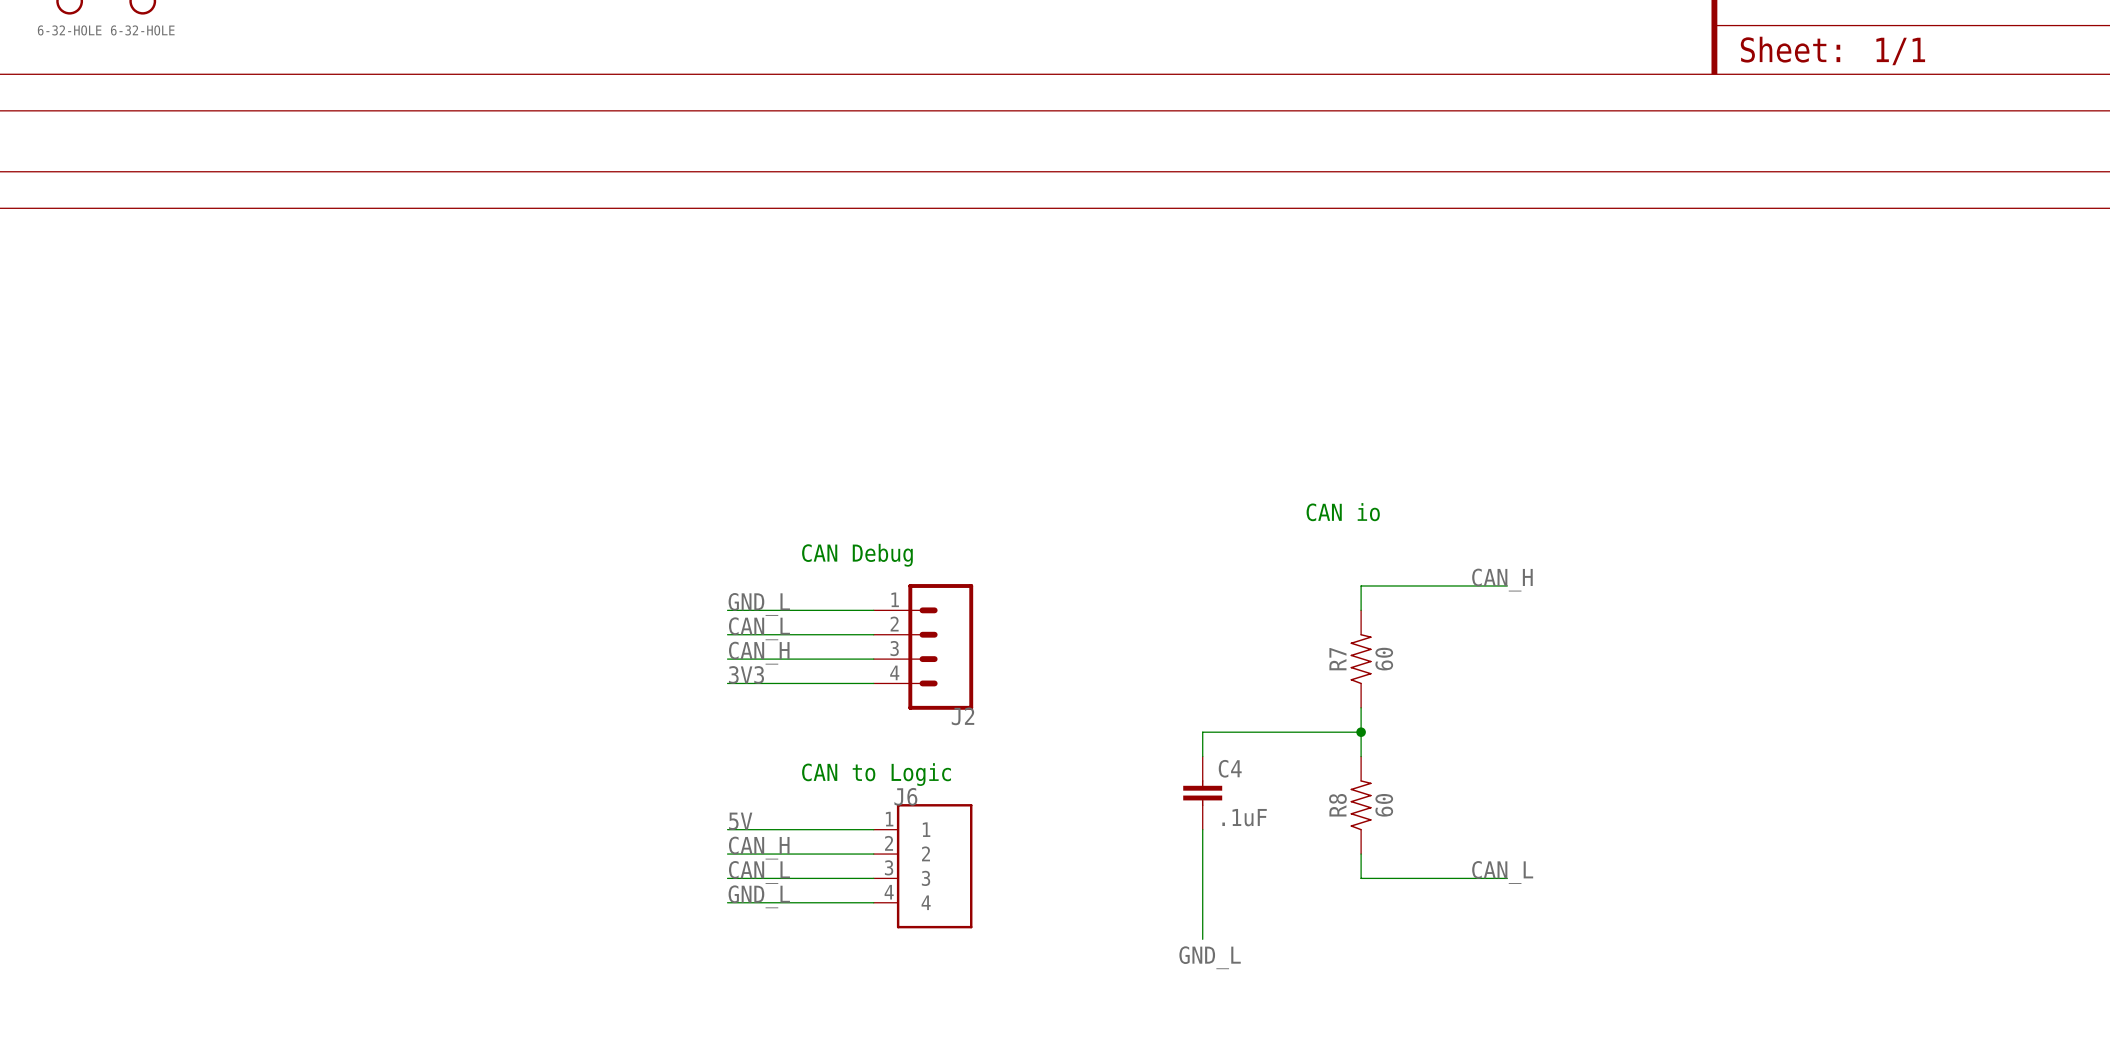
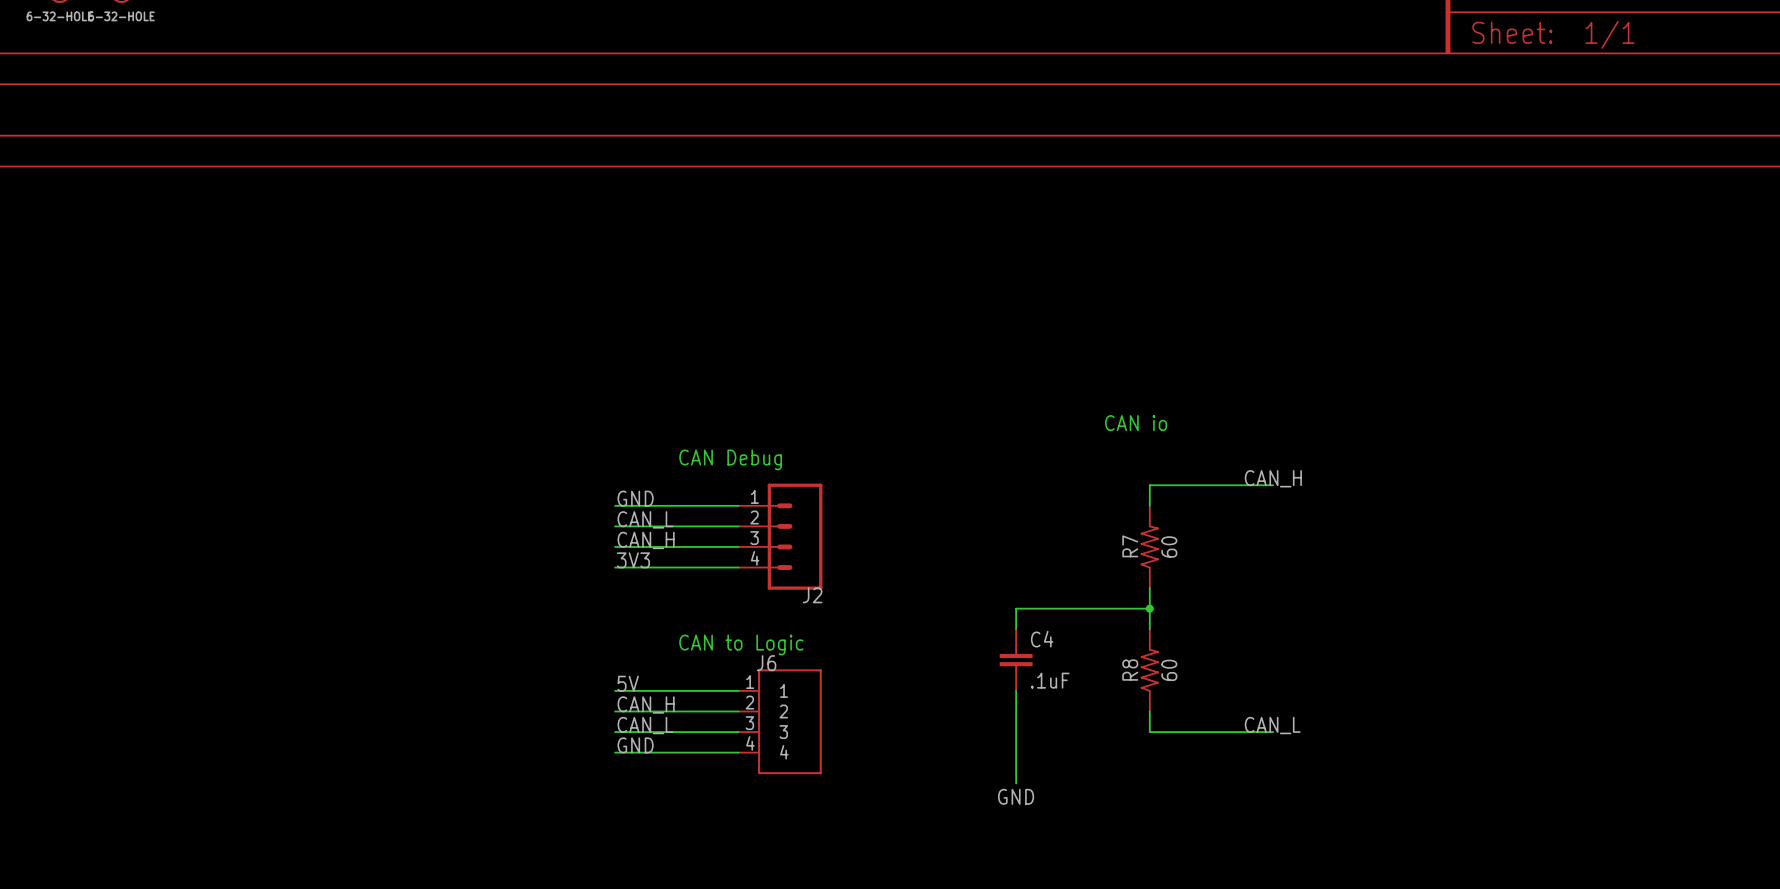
label: GND_L (759, 604) -> GND (635, 498)
label: GND_L (759, 896) -> GND (635, 745)
label: GND_L (1210, 957) -> GND (1016, 796)

